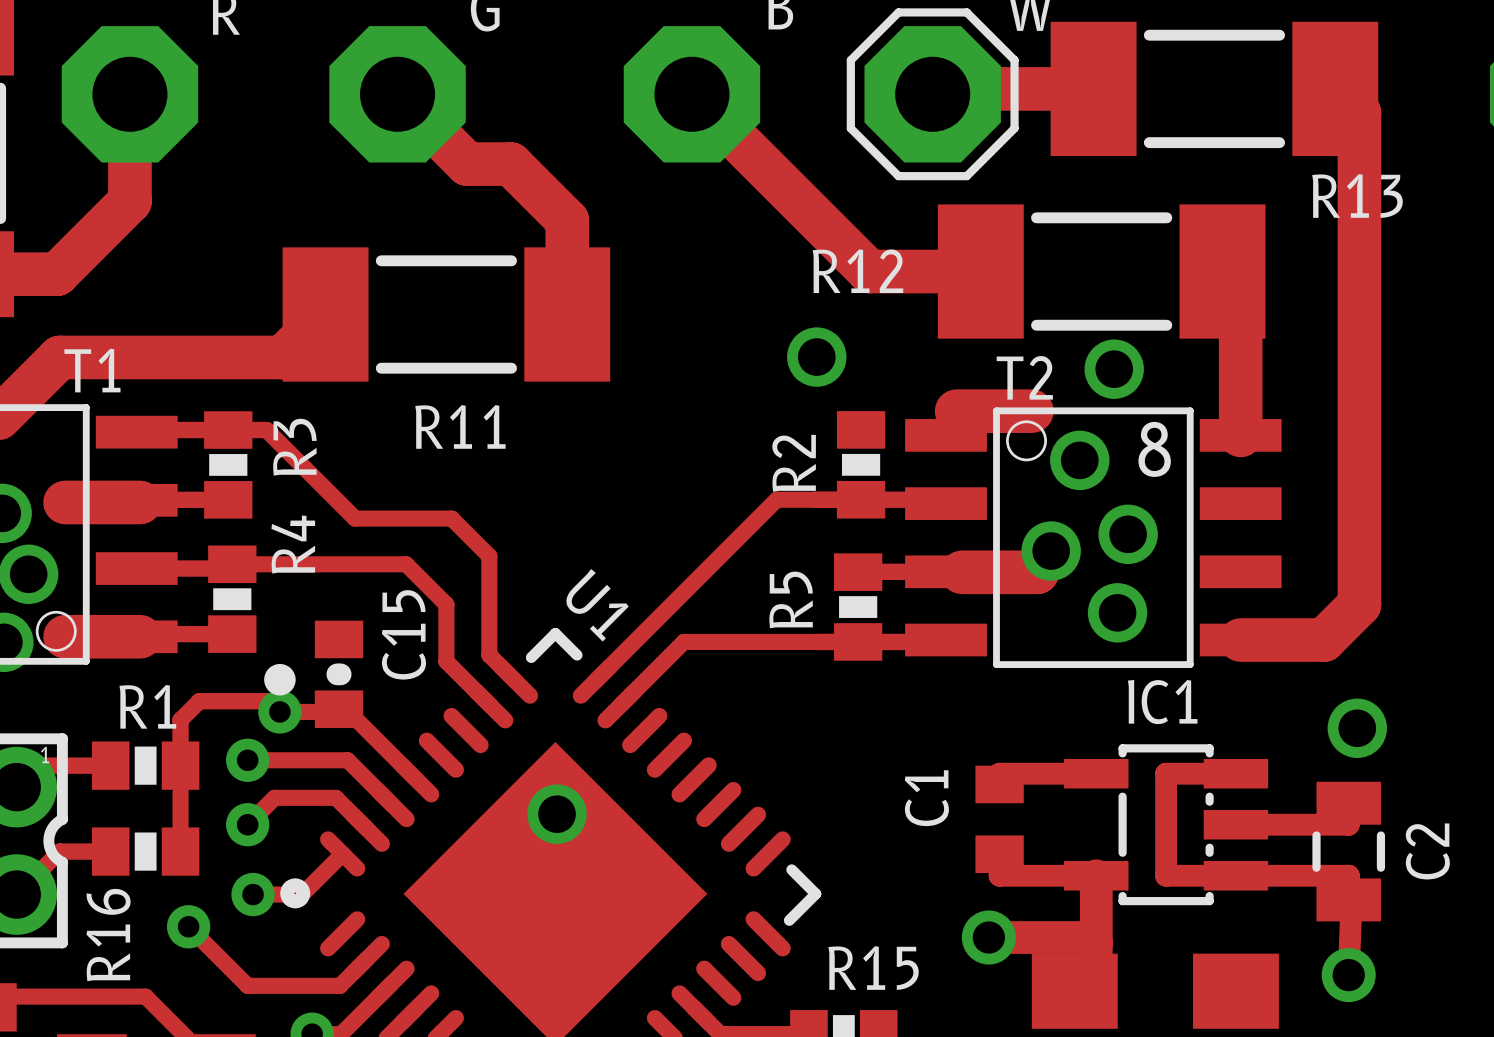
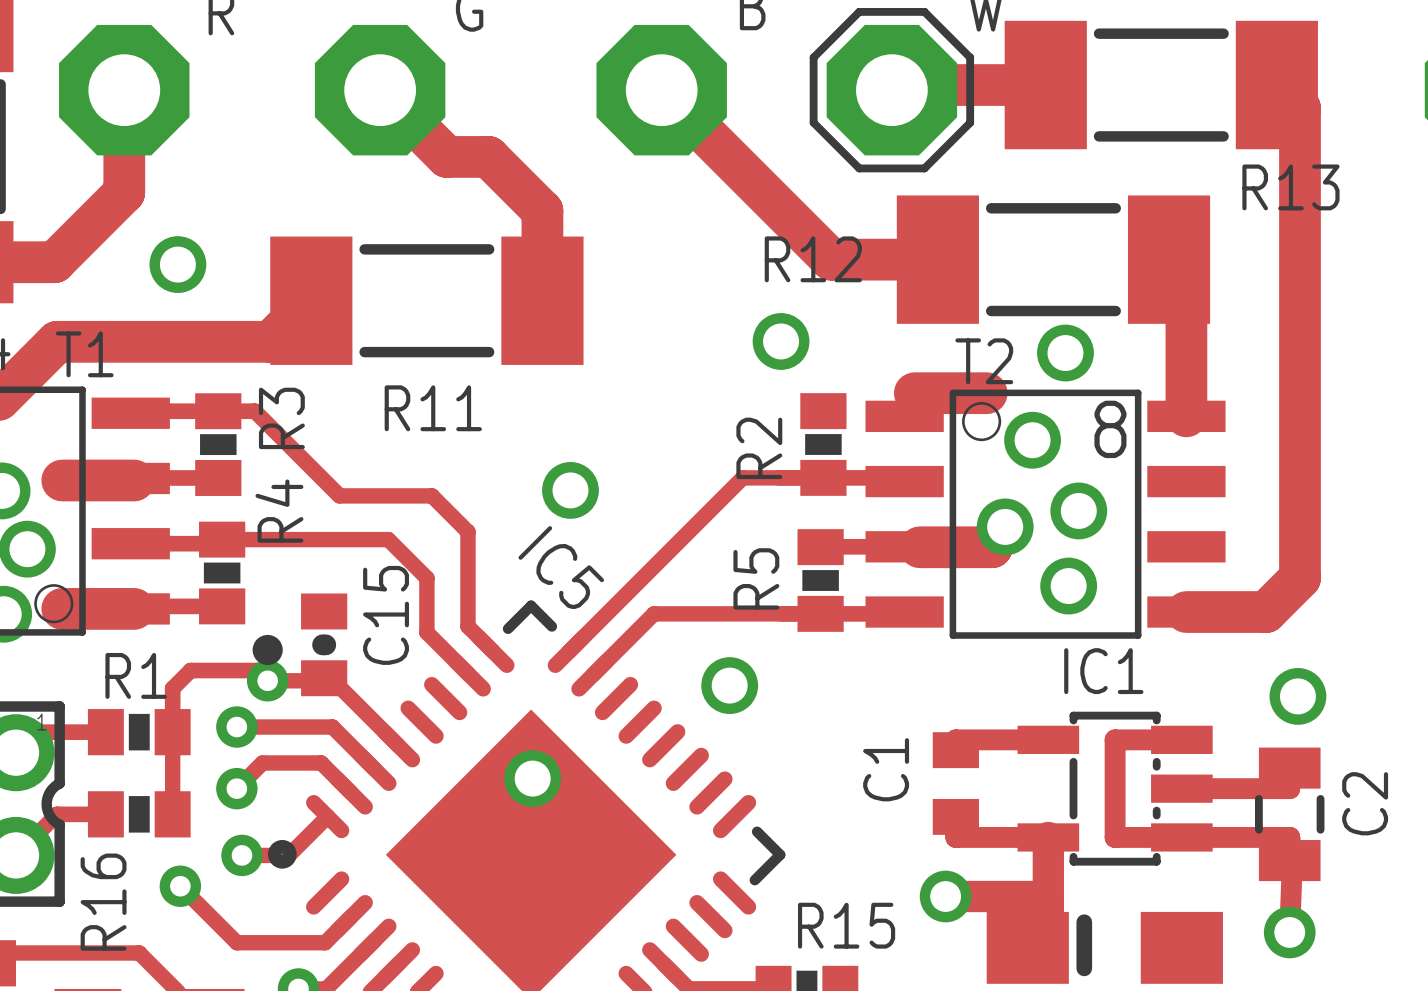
via: none -> (177, 264)
via: none -> (570, 490)
U1 name: U1 (597, 605) -> IC5 (561, 567)
via: none -> (729, 685)
line: none -> (1084, 922) (1084, 968)

